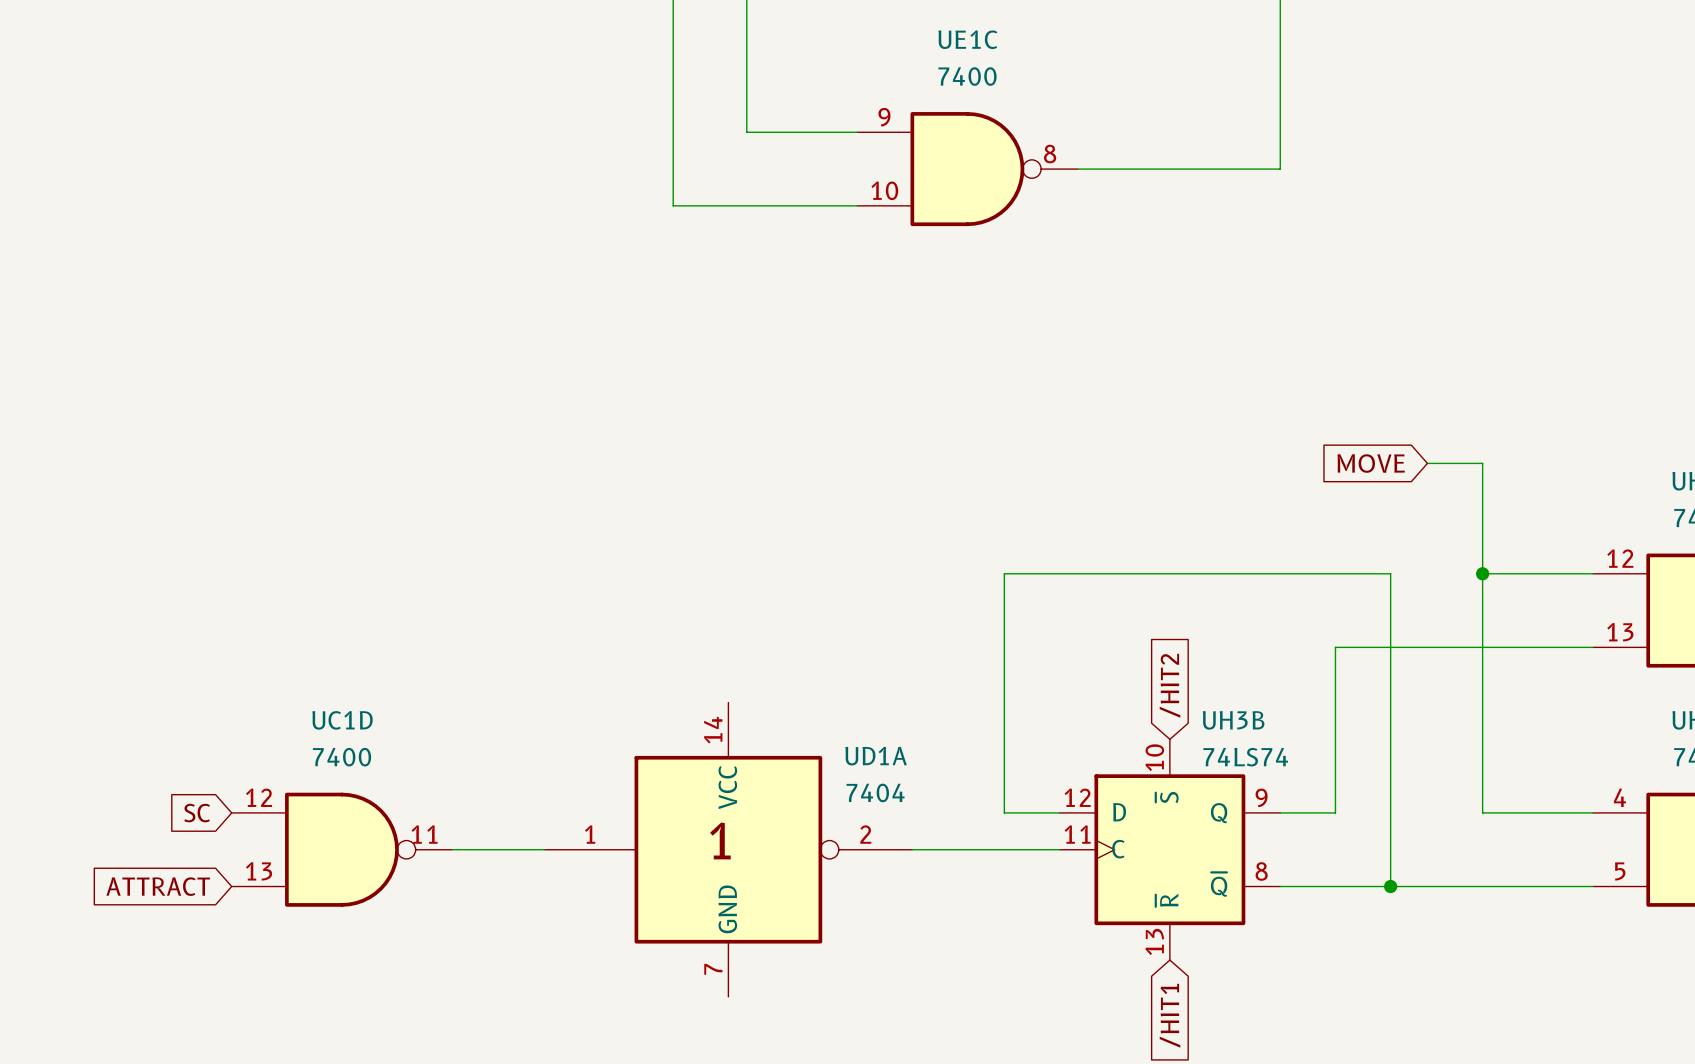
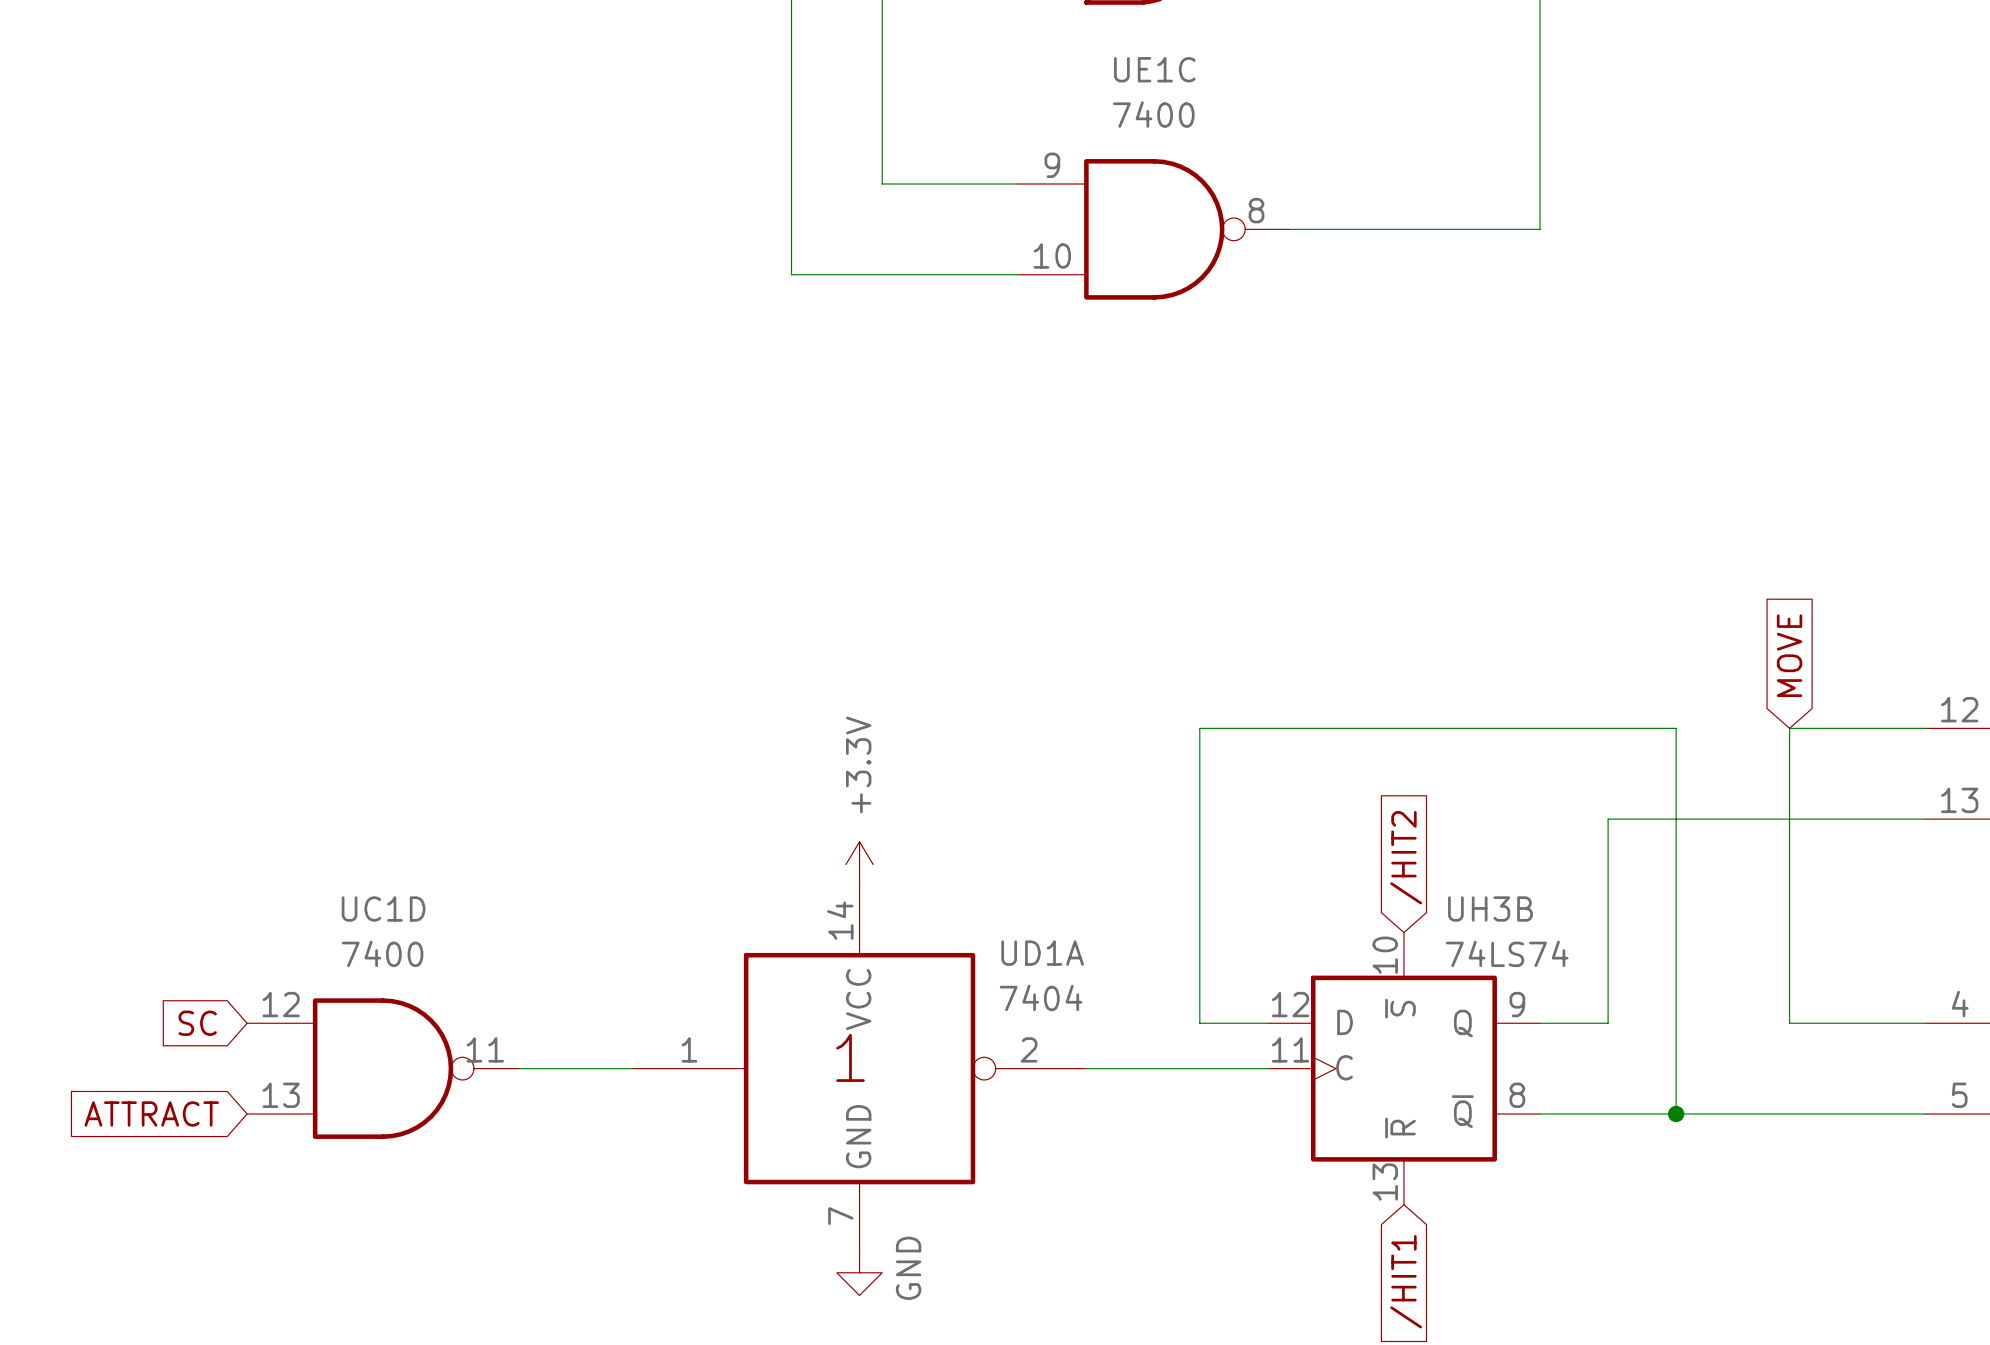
global label rotation: 0° (1371, 463) -> 90° clockwise (1789, 655)
wire: (1427, 463) (1482, 463) (1482, 573) -> none
junction: (1482, 573) -> none
power symbol: none -> +3.3V (859, 864)
power symbol: none -> GND (859, 1272)

